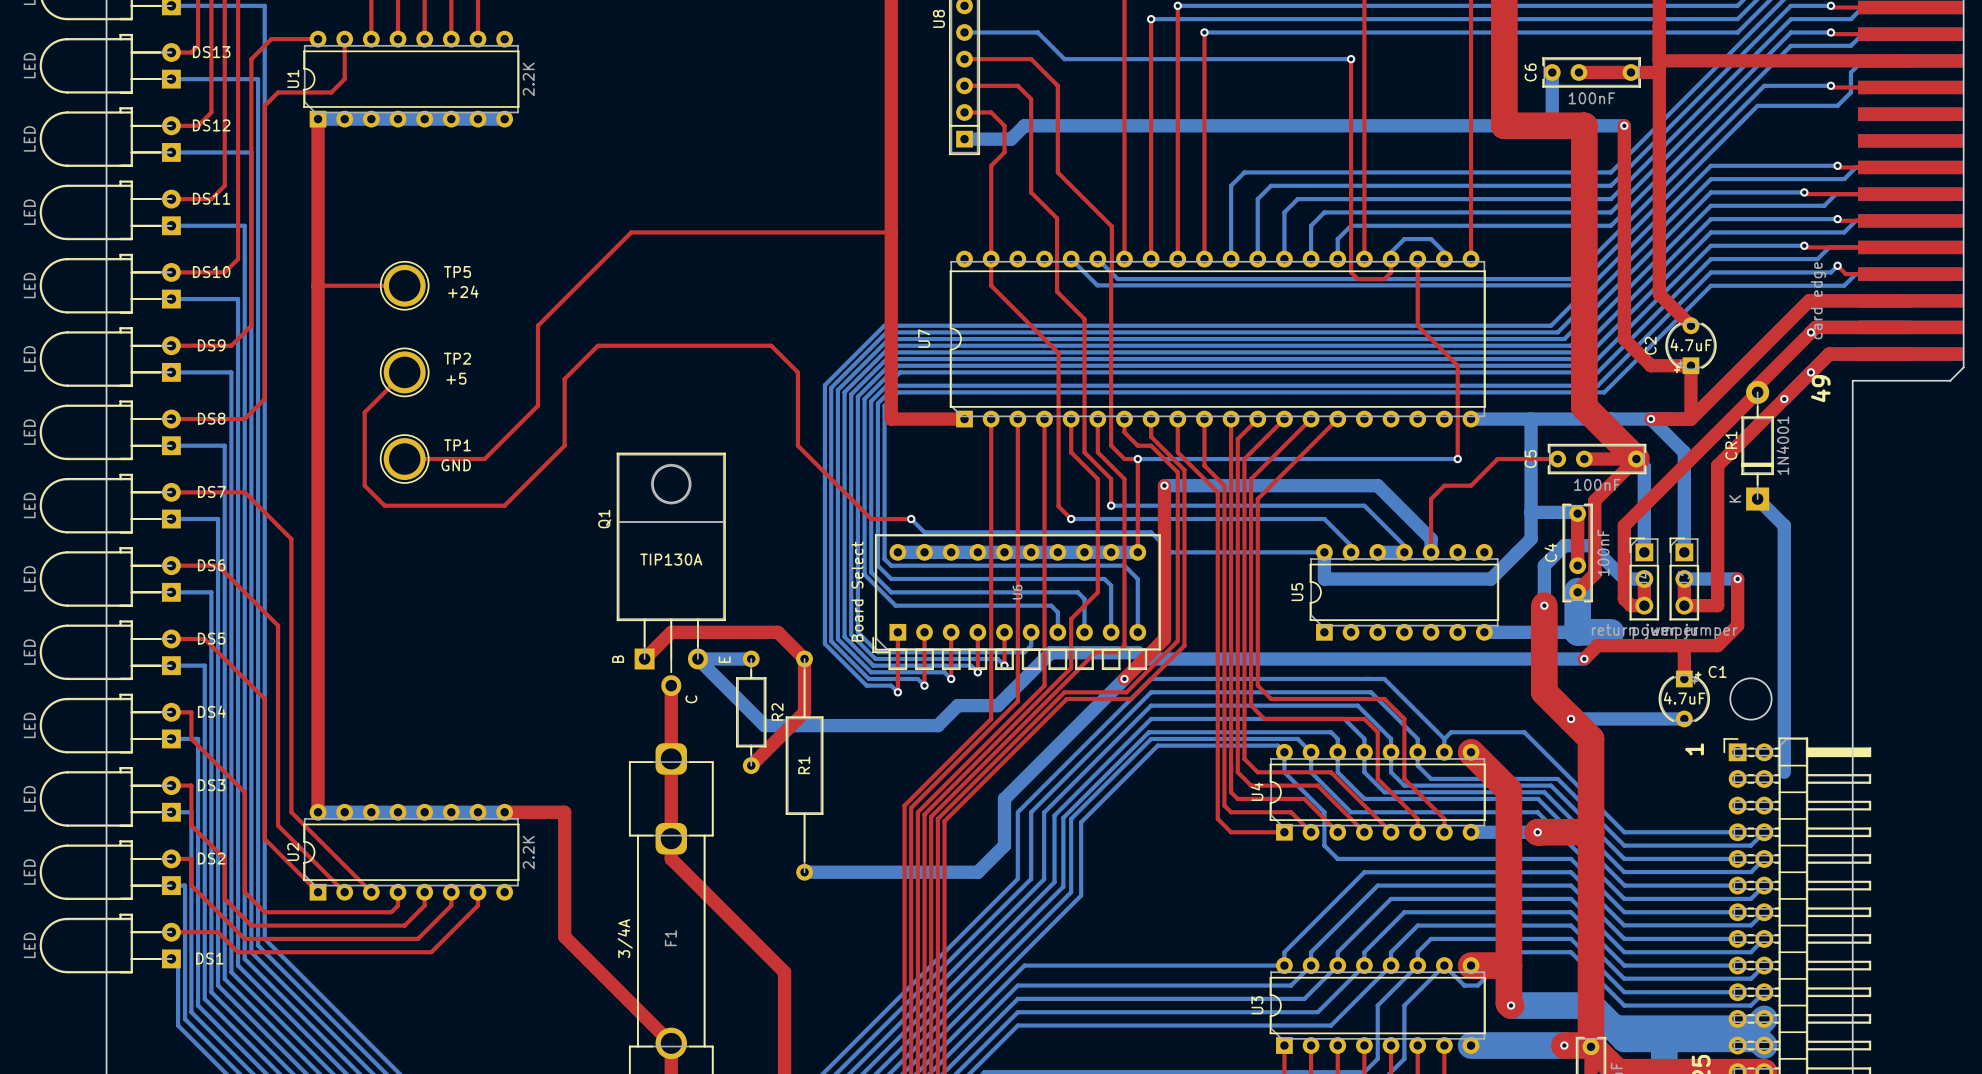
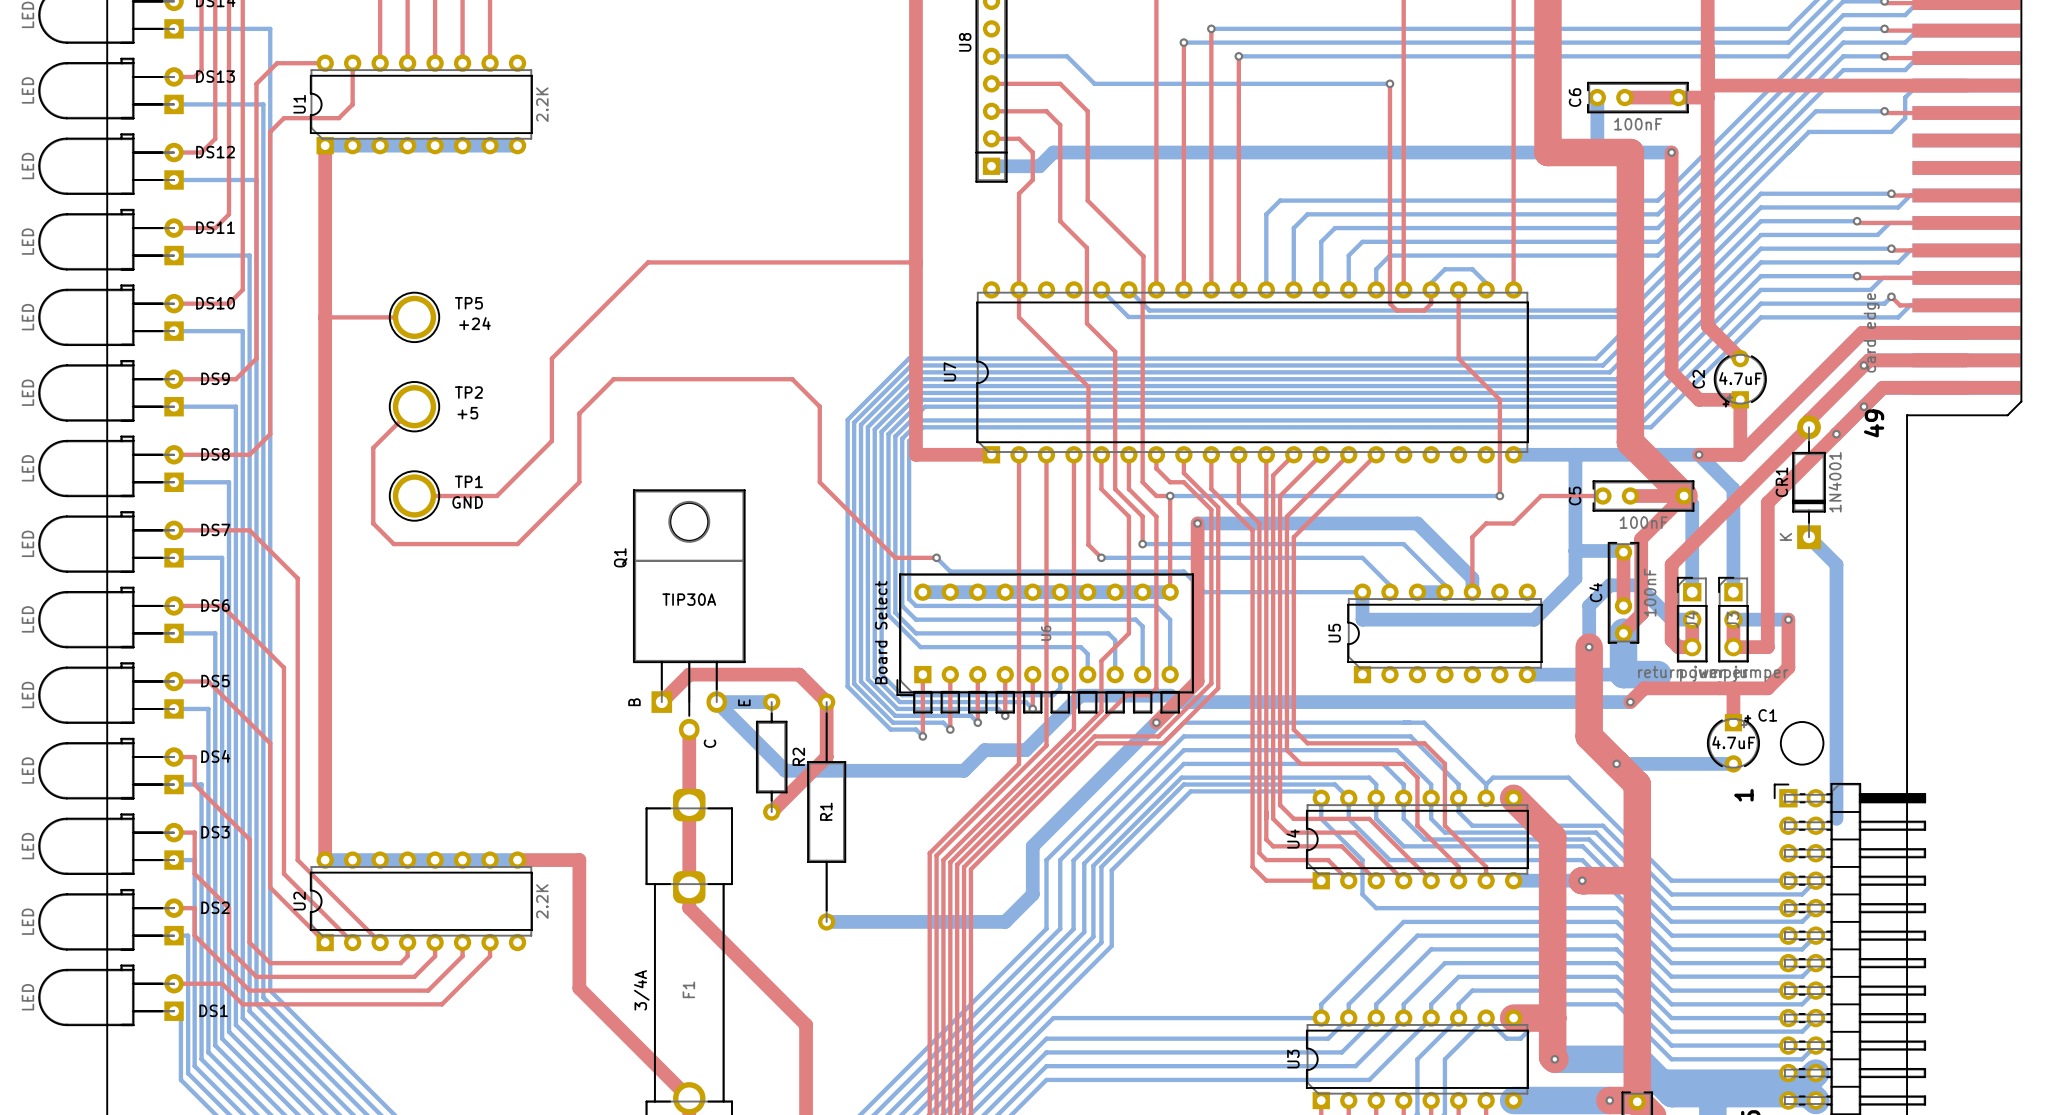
Q1 value: TIP130A (671, 559) -> TIP30A (689, 599)

